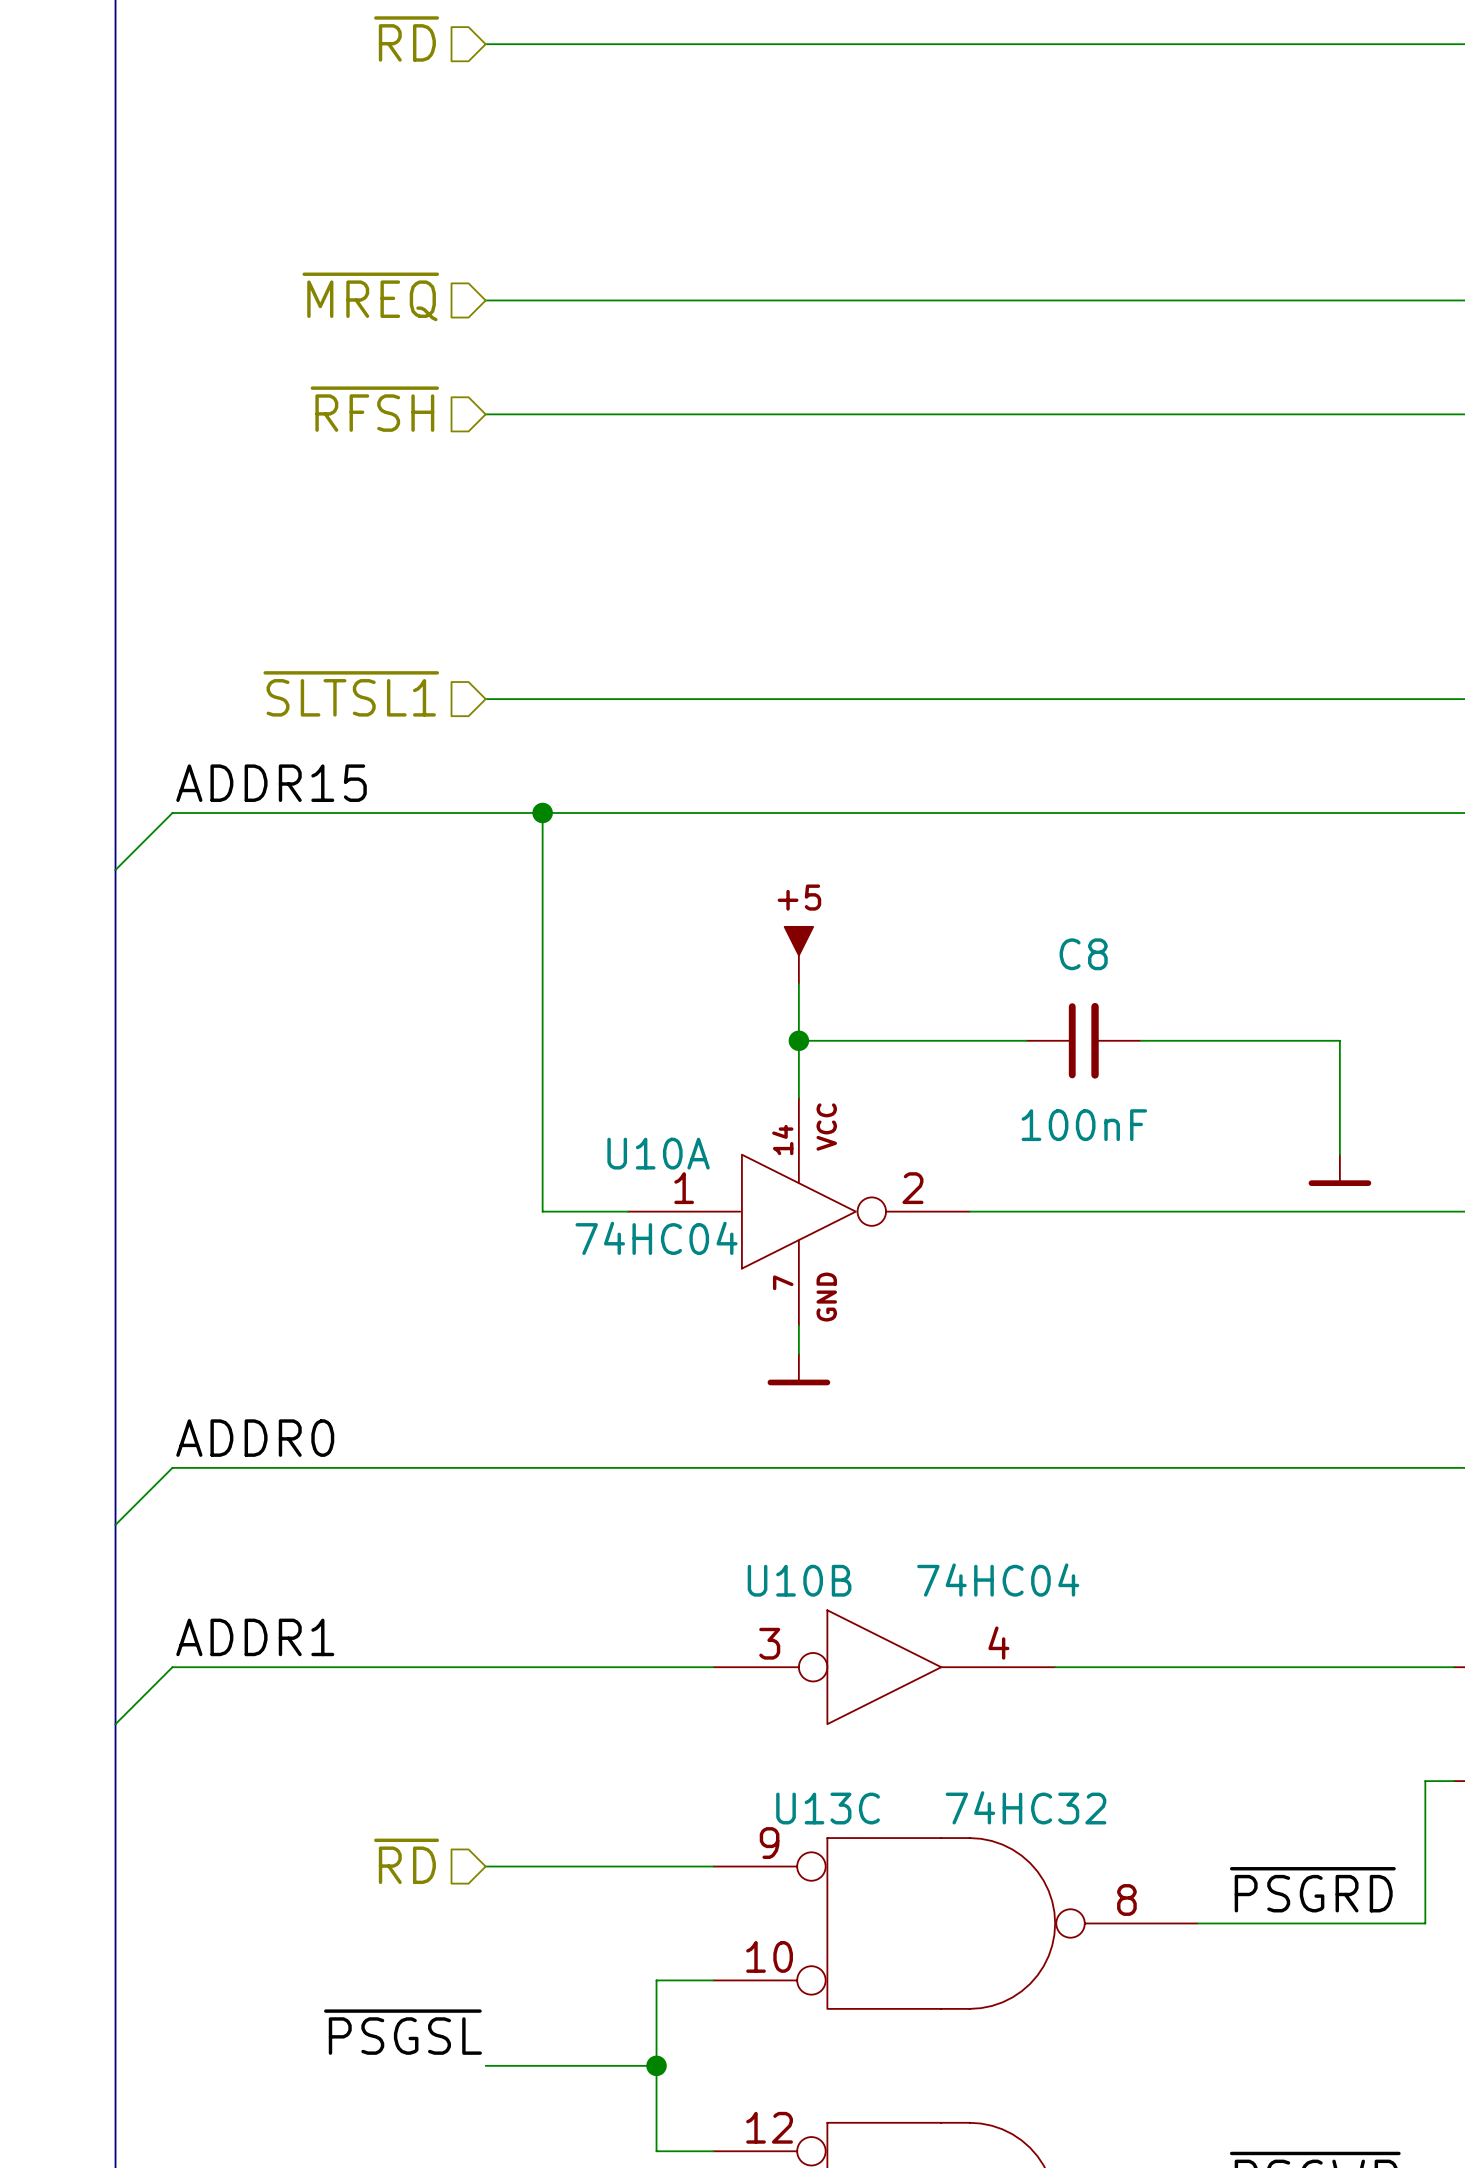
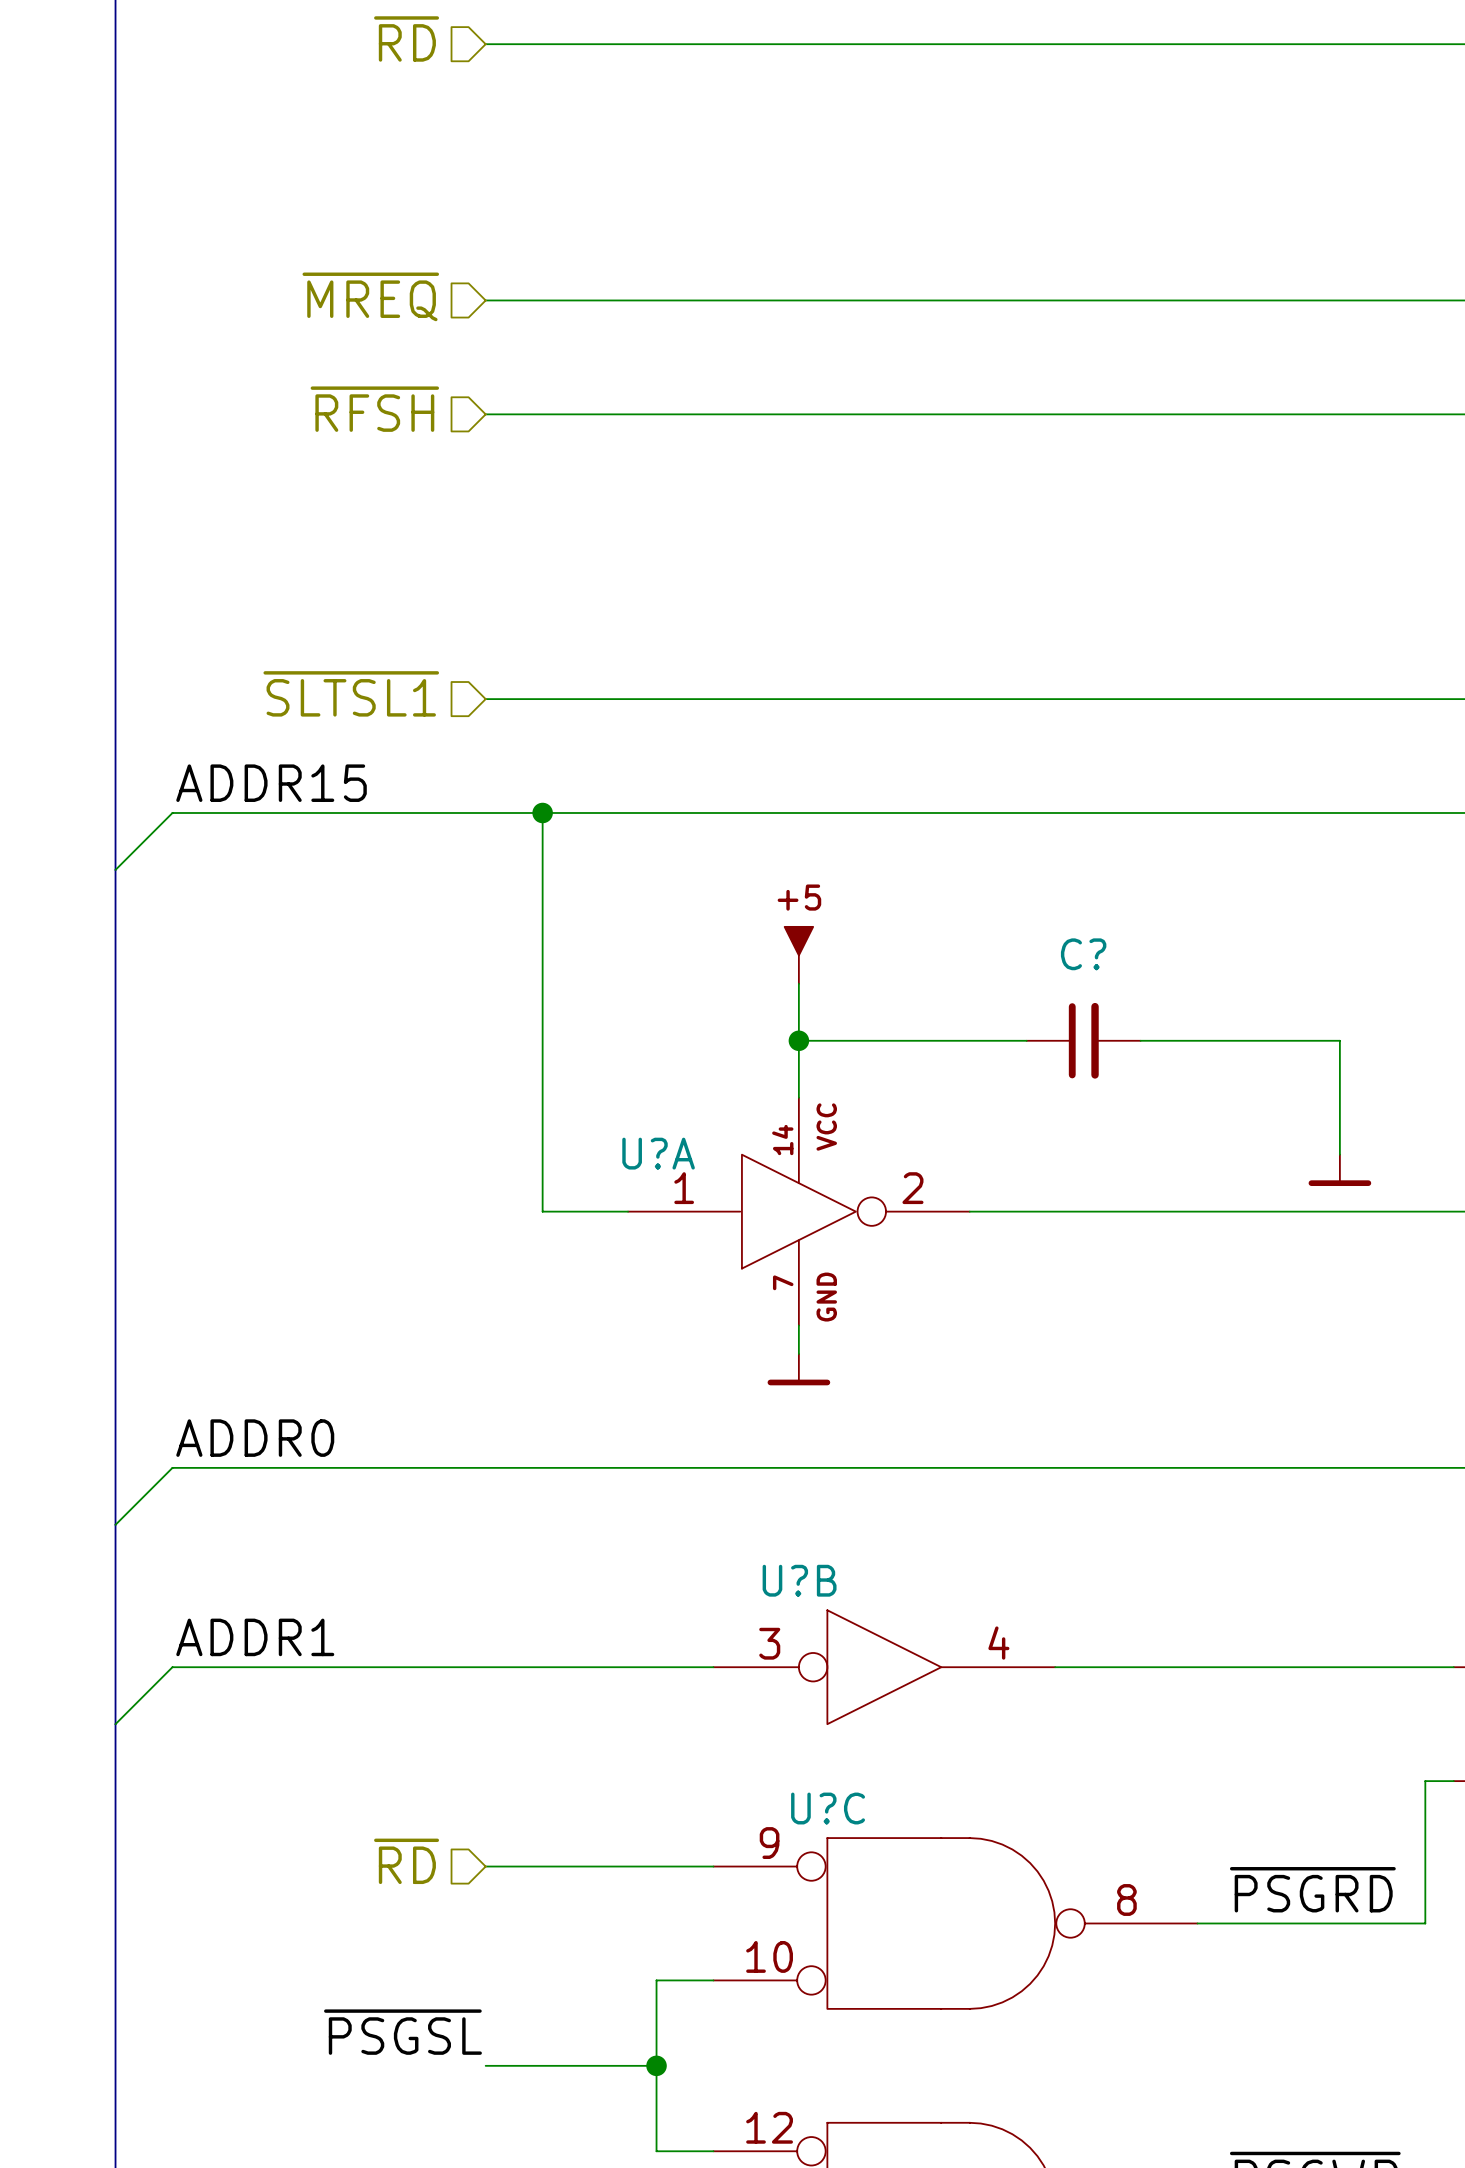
C8 name: C8 (1083, 954) -> C? (1083, 954)
C8 value: 100nF (1084, 1125) -> none
U10A name: U10A (658, 1153) -> U?A (658, 1153)
U10A value: 74HC04 (656, 1238) -> none
U10B name: U10B (799, 1580) -> U?B (799, 1580)
U10B value: 74HC04 (998, 1580) -> none
U13C value: 74HC32 (1026, 1807) -> none
U13C name: U13C (828, 1808) -> U?C (828, 1808)

